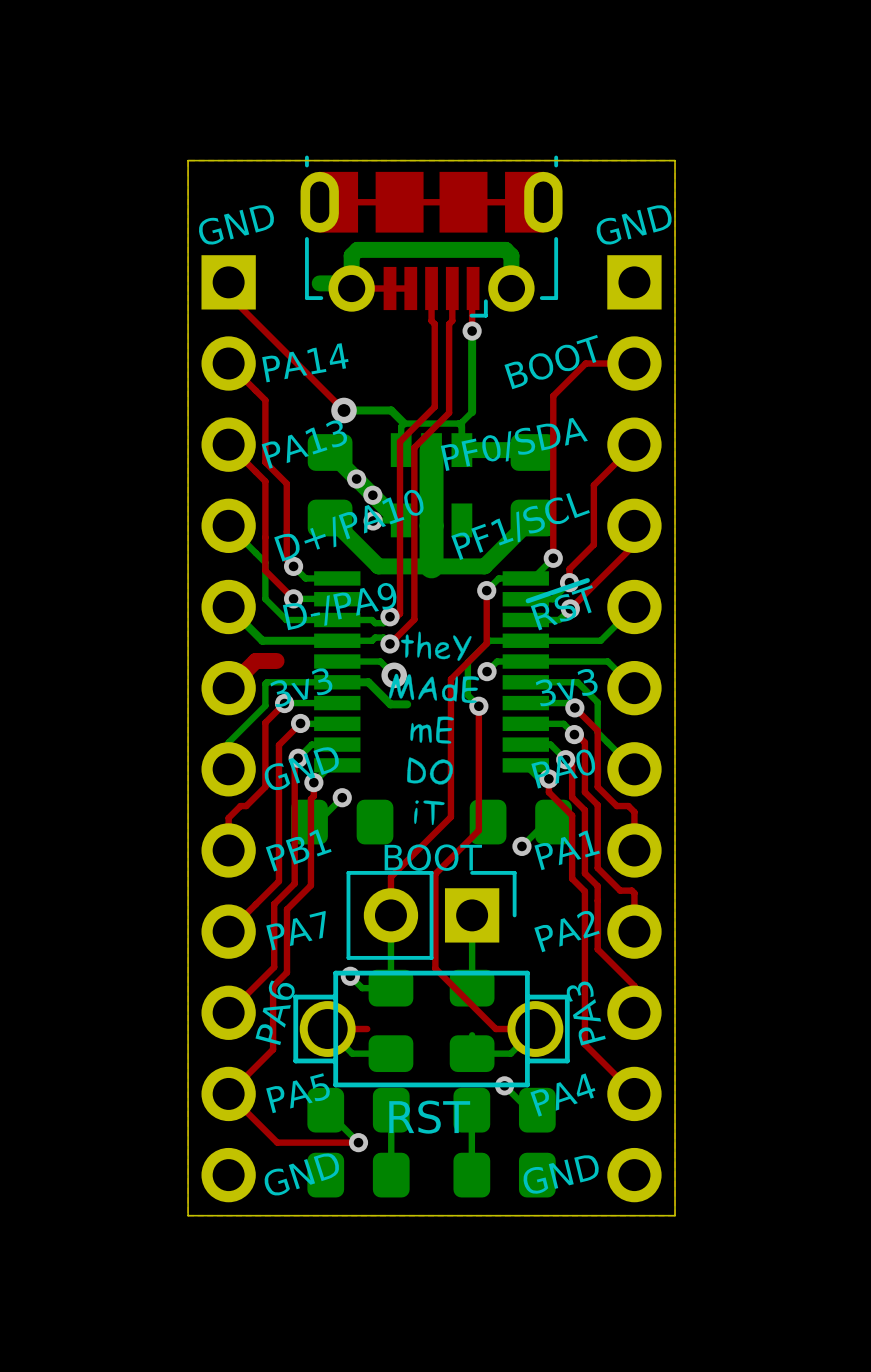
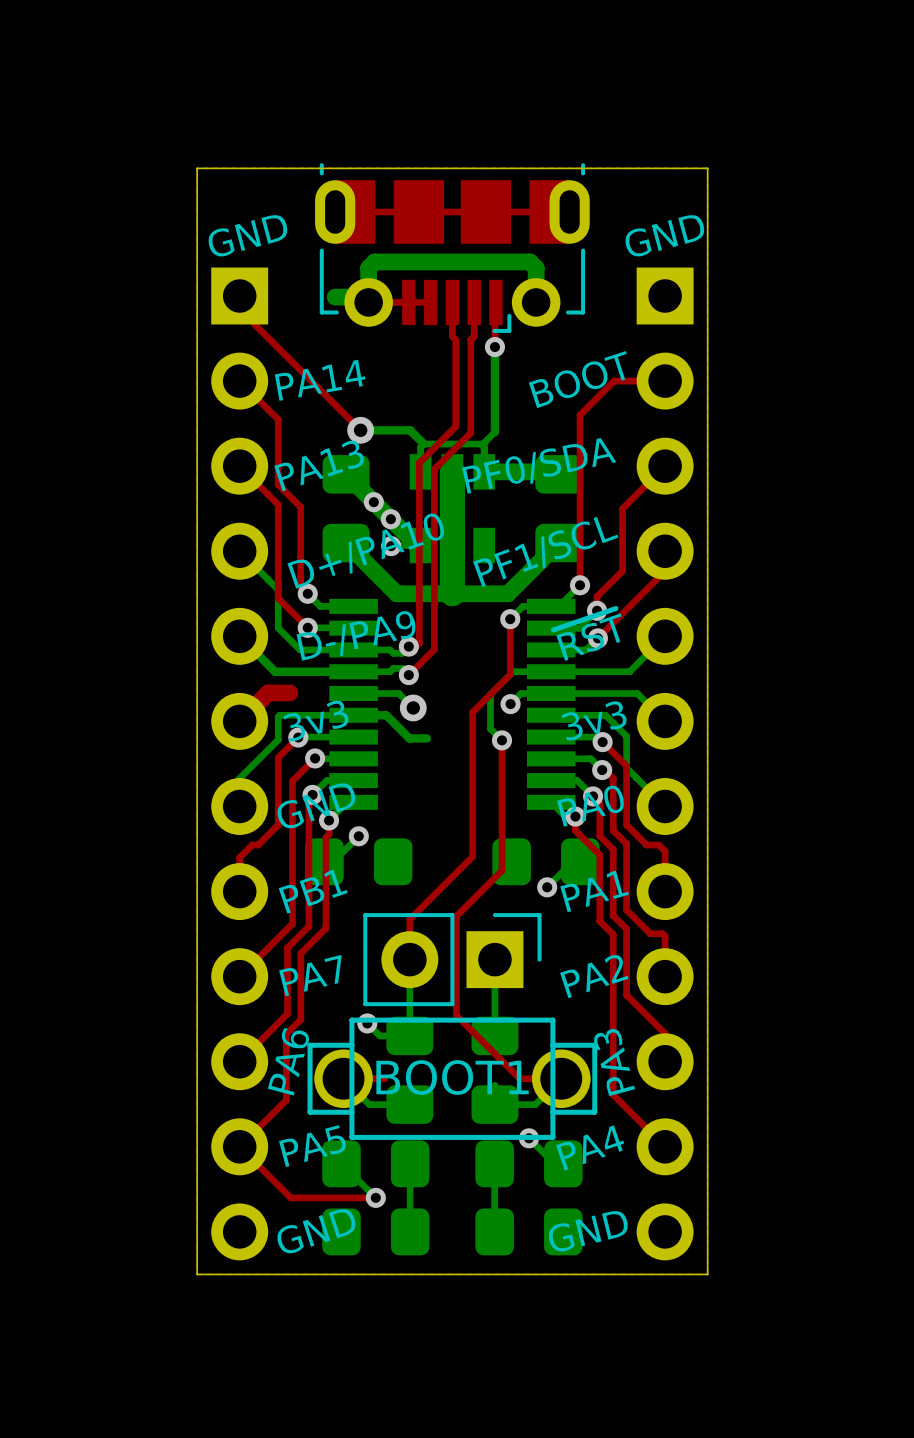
drawing: [389, 631, 480, 826] -> none
text: BOOT (433, 857) -> none
RST name: RST (429, 1117) -> BOOT1 (452, 1077)

